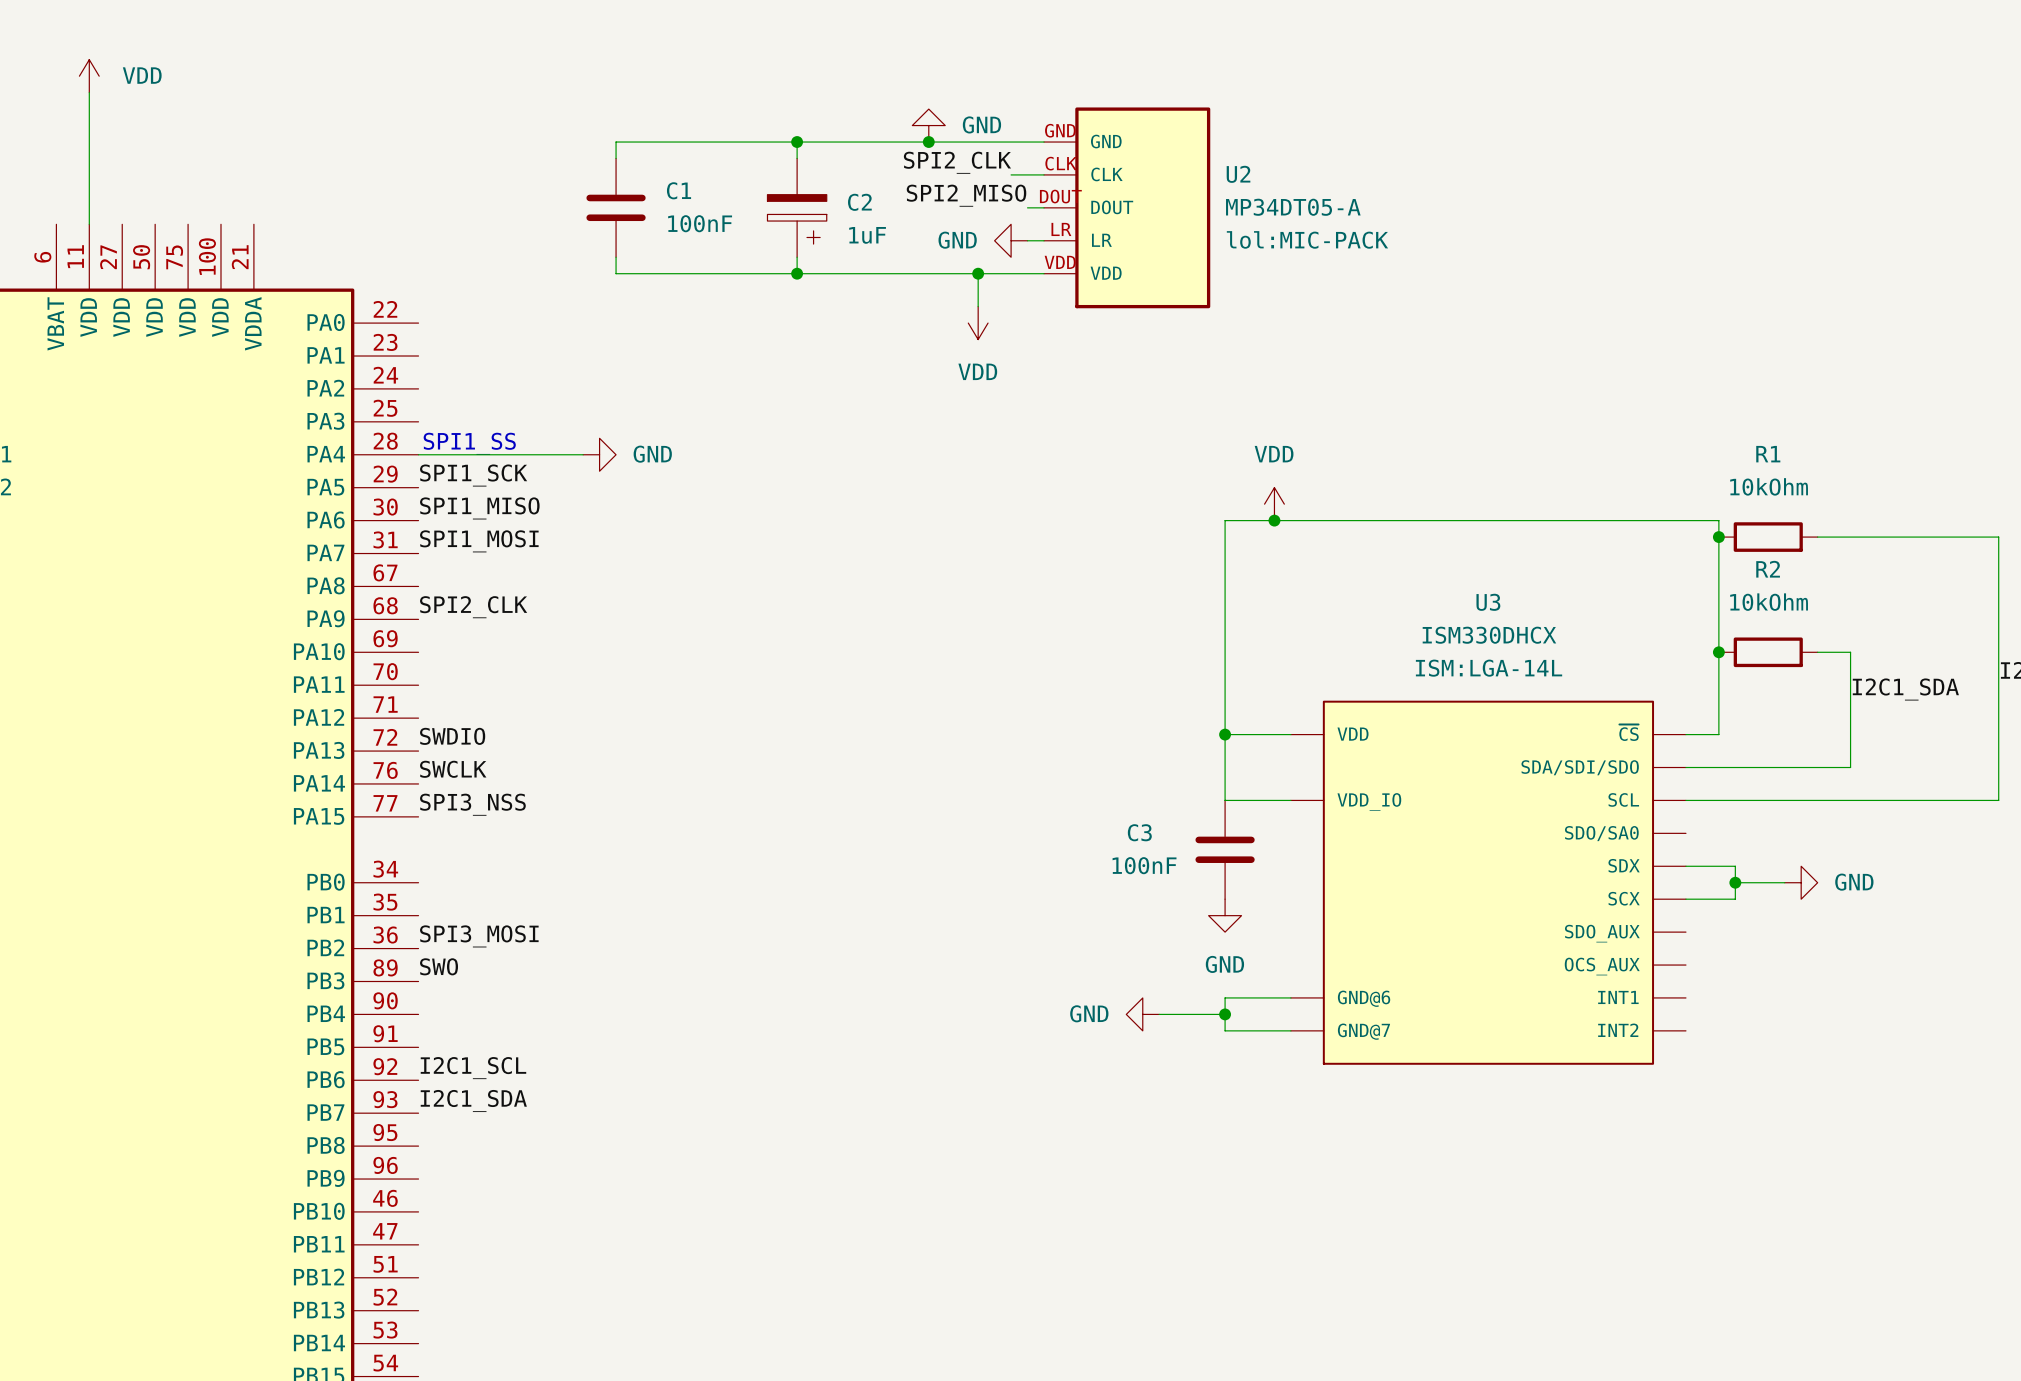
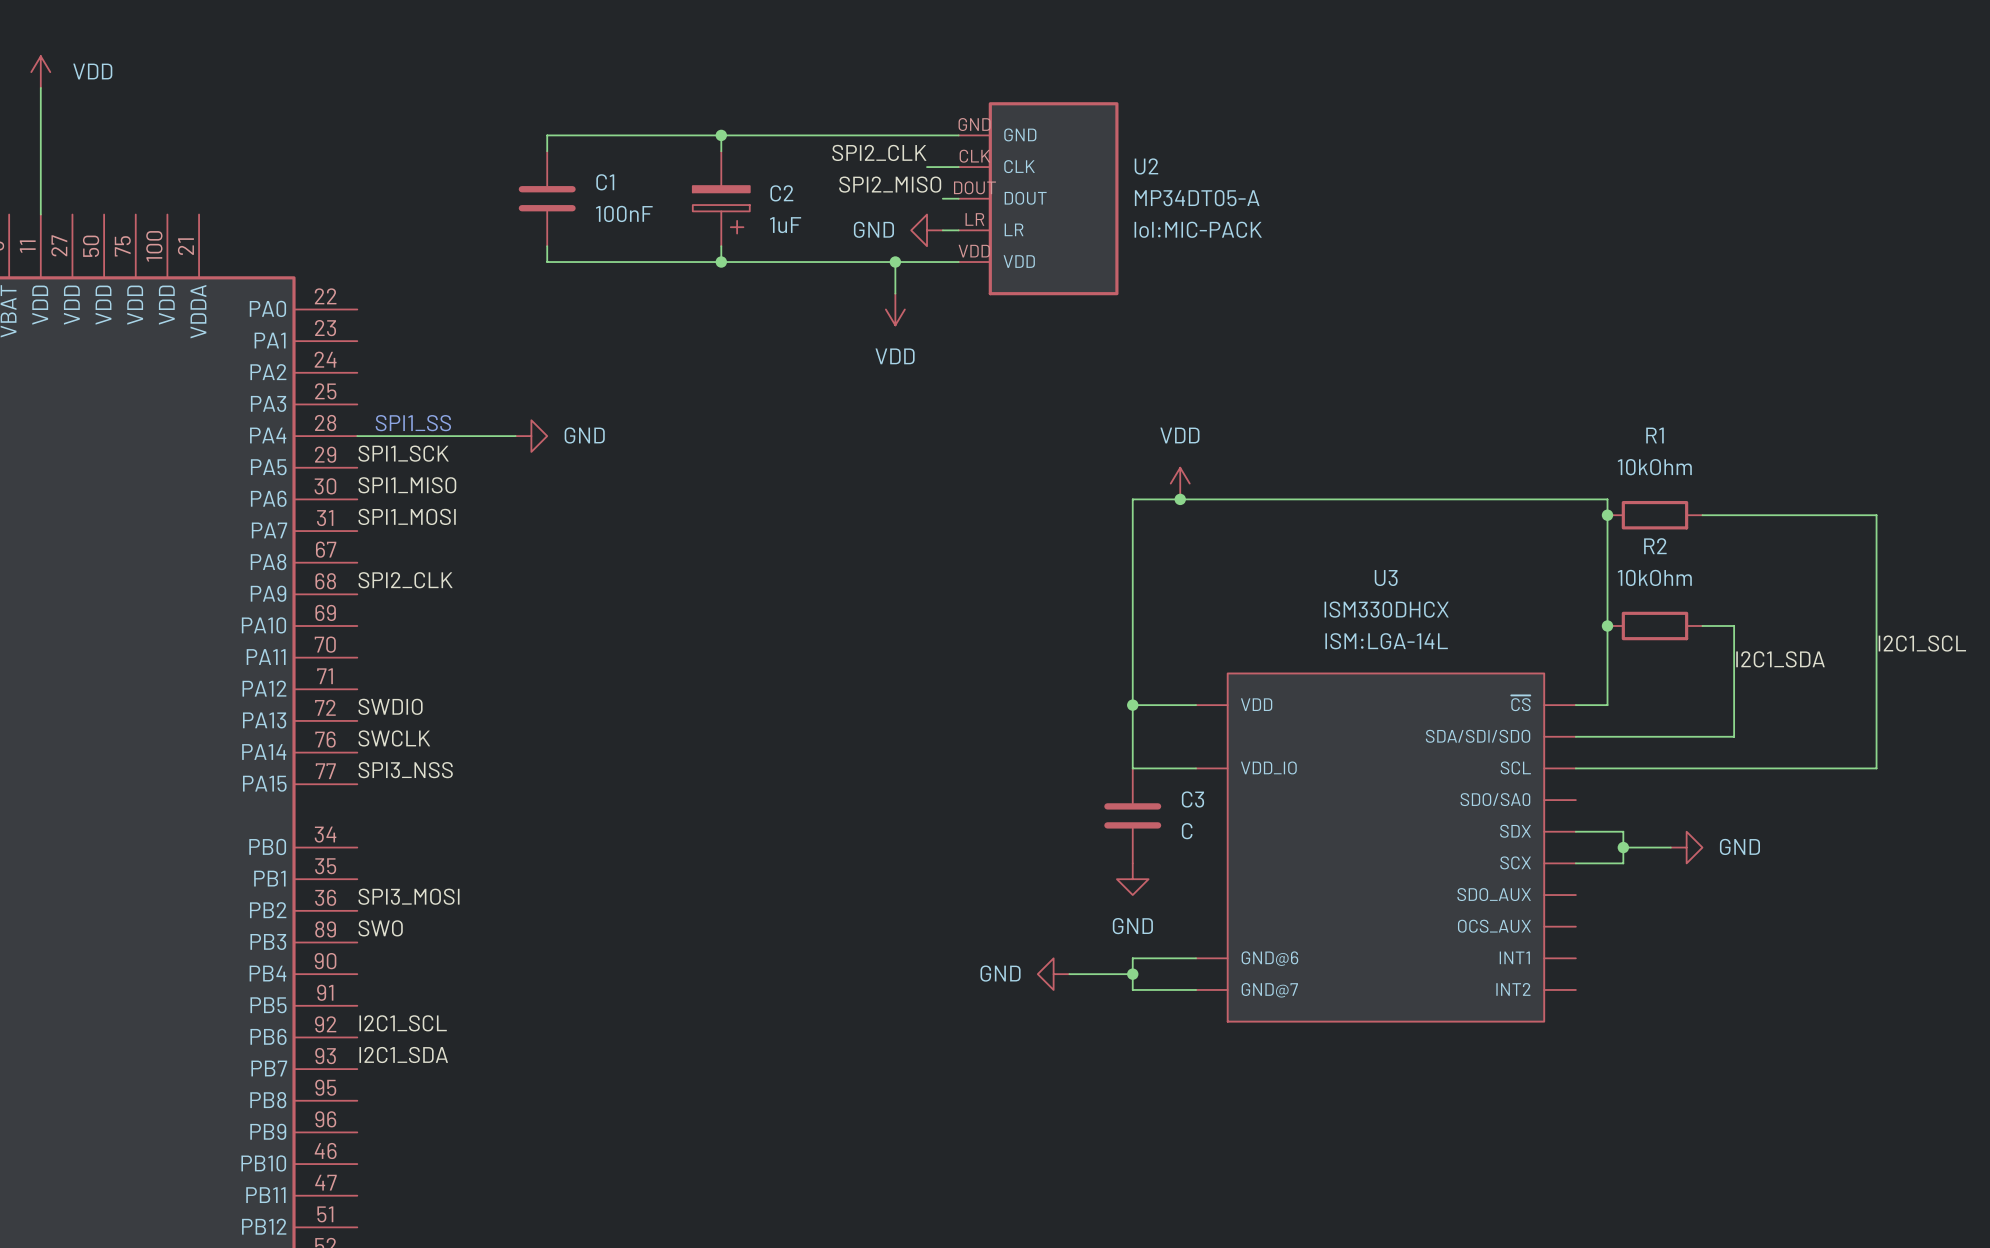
power symbol: GND (928, 125) -> none
junction: (928, 142) -> none
C3 name position: C3 (1139, 832) -> C3 (1192, 799)
C3 value: 100nF (1144, 865) -> C (1187, 831)

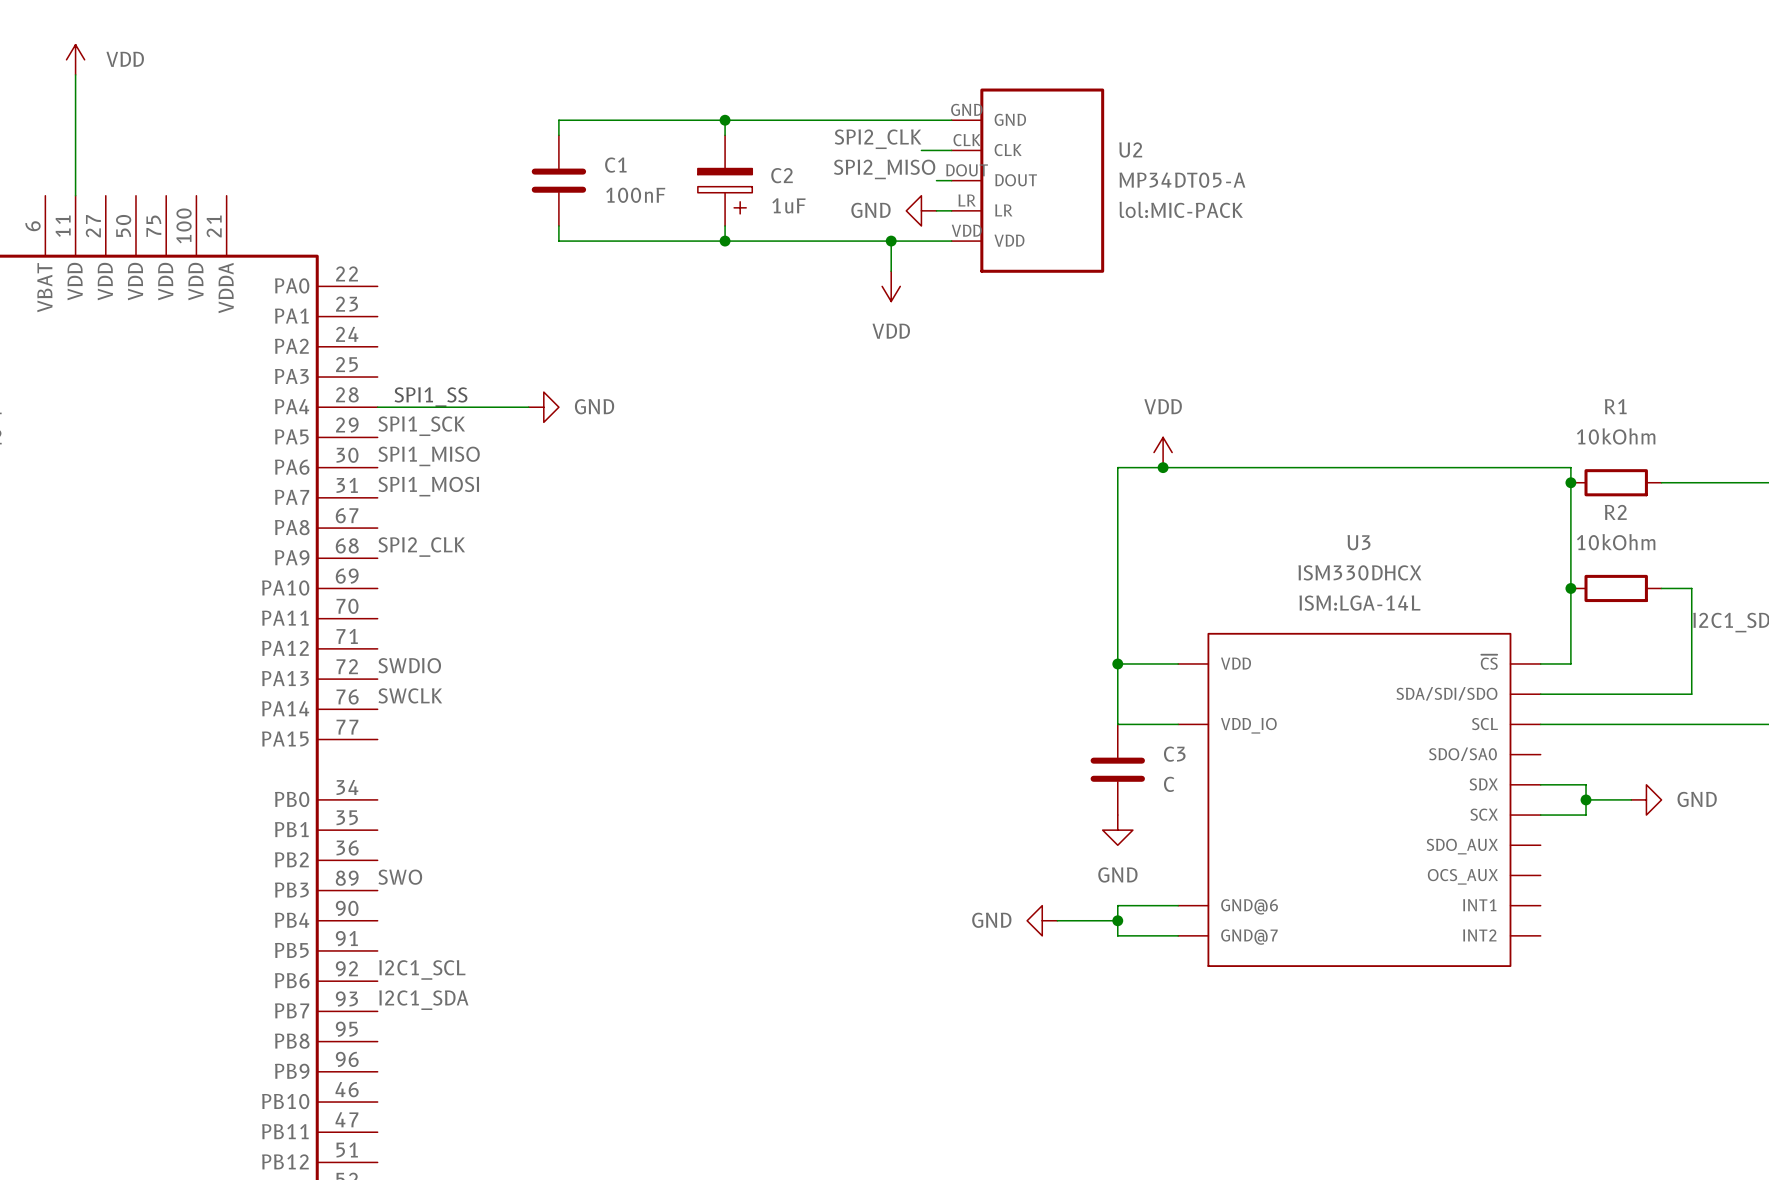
label: SPI3_NSS (405, 770) -> none
label: SPI3_MOSI (408, 896) -> none

